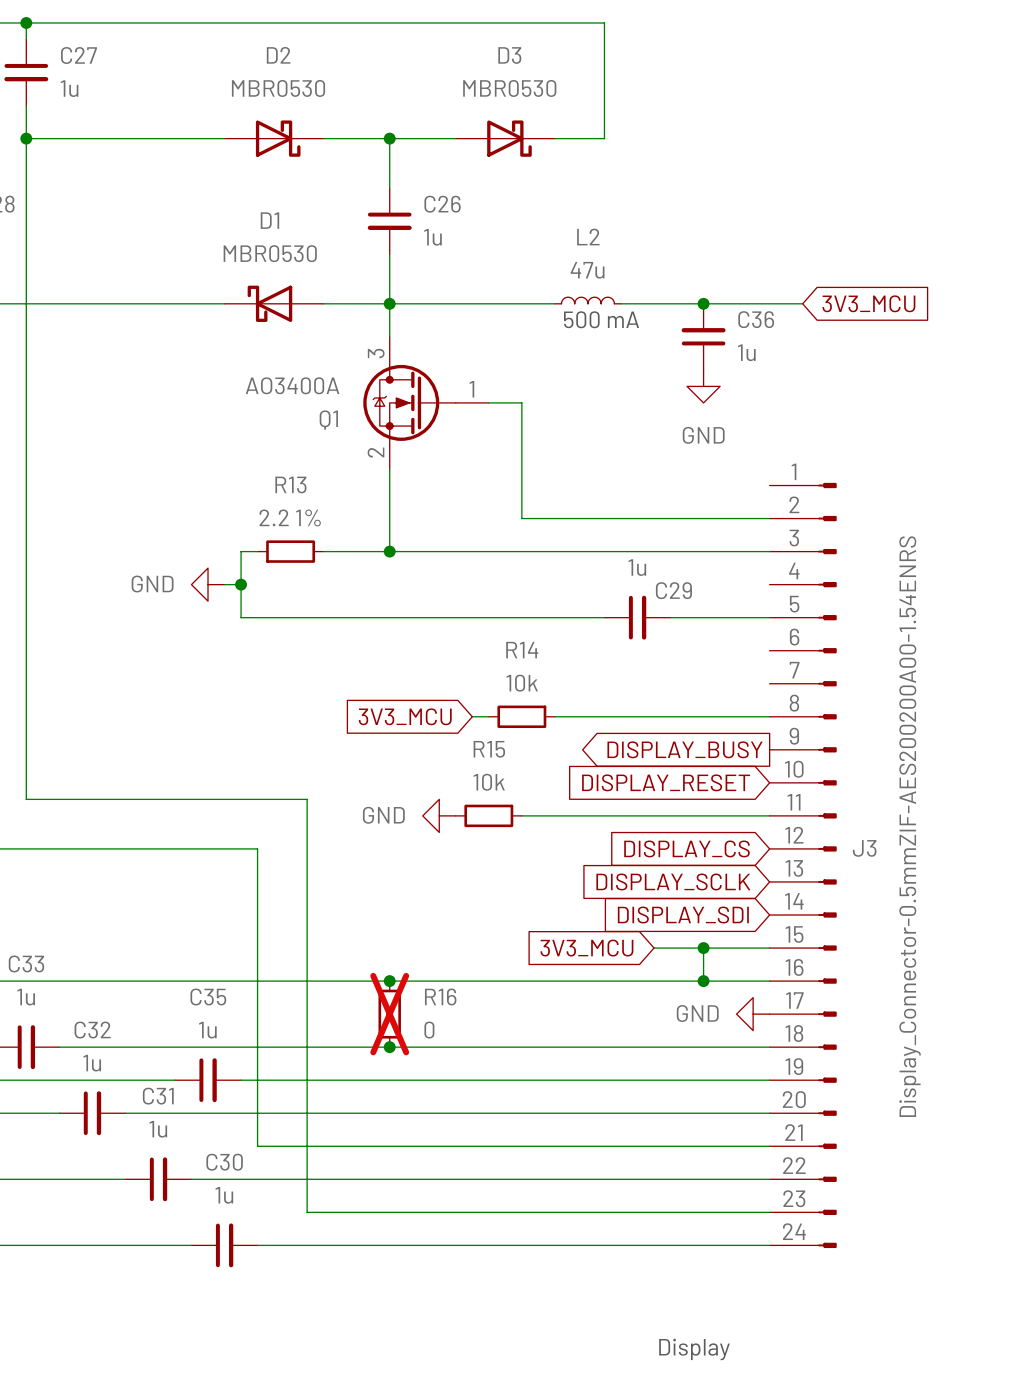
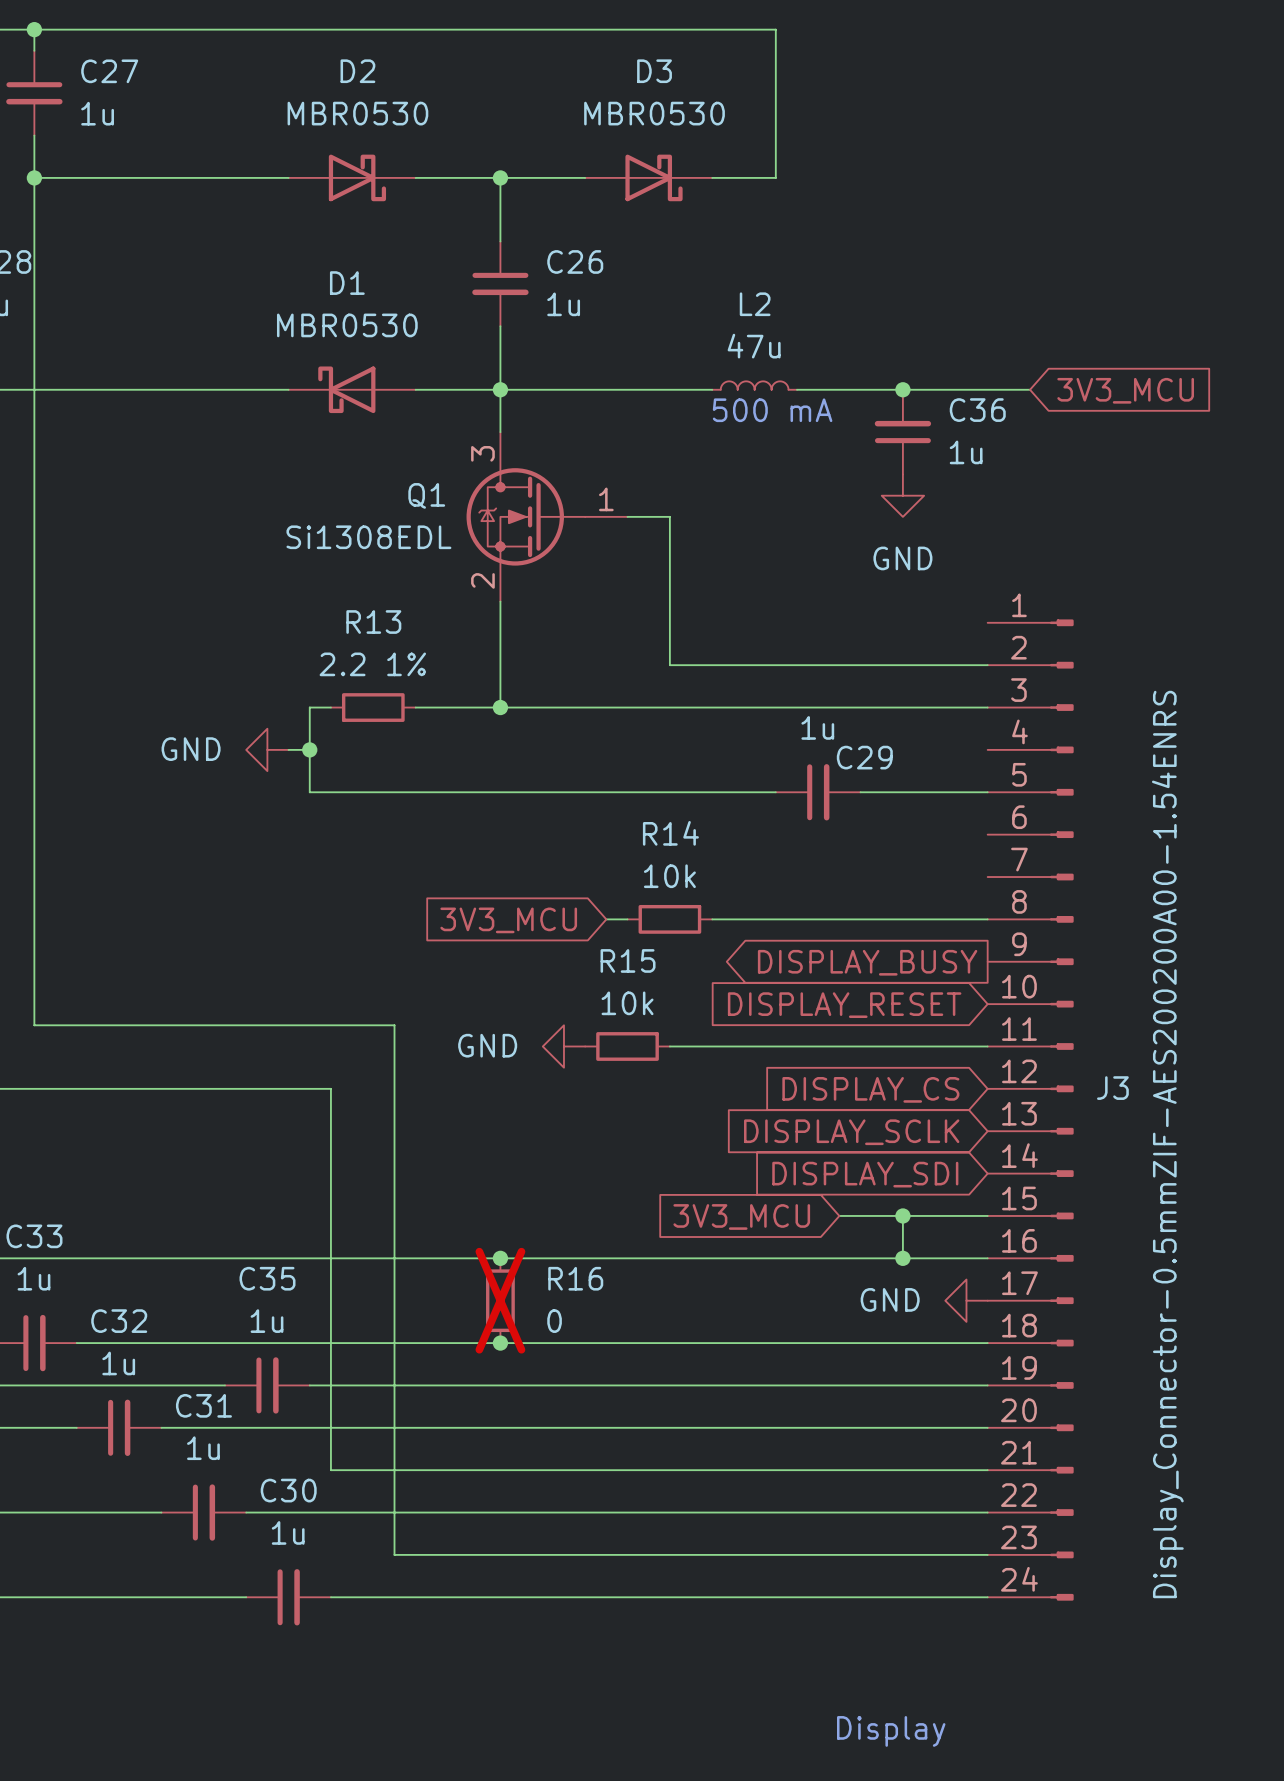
Q1 value: AO3400A (292, 385) -> Si1308EDL (368, 537)
Q1 name position: Q1 (328, 420) -> Q1 (426, 495)

